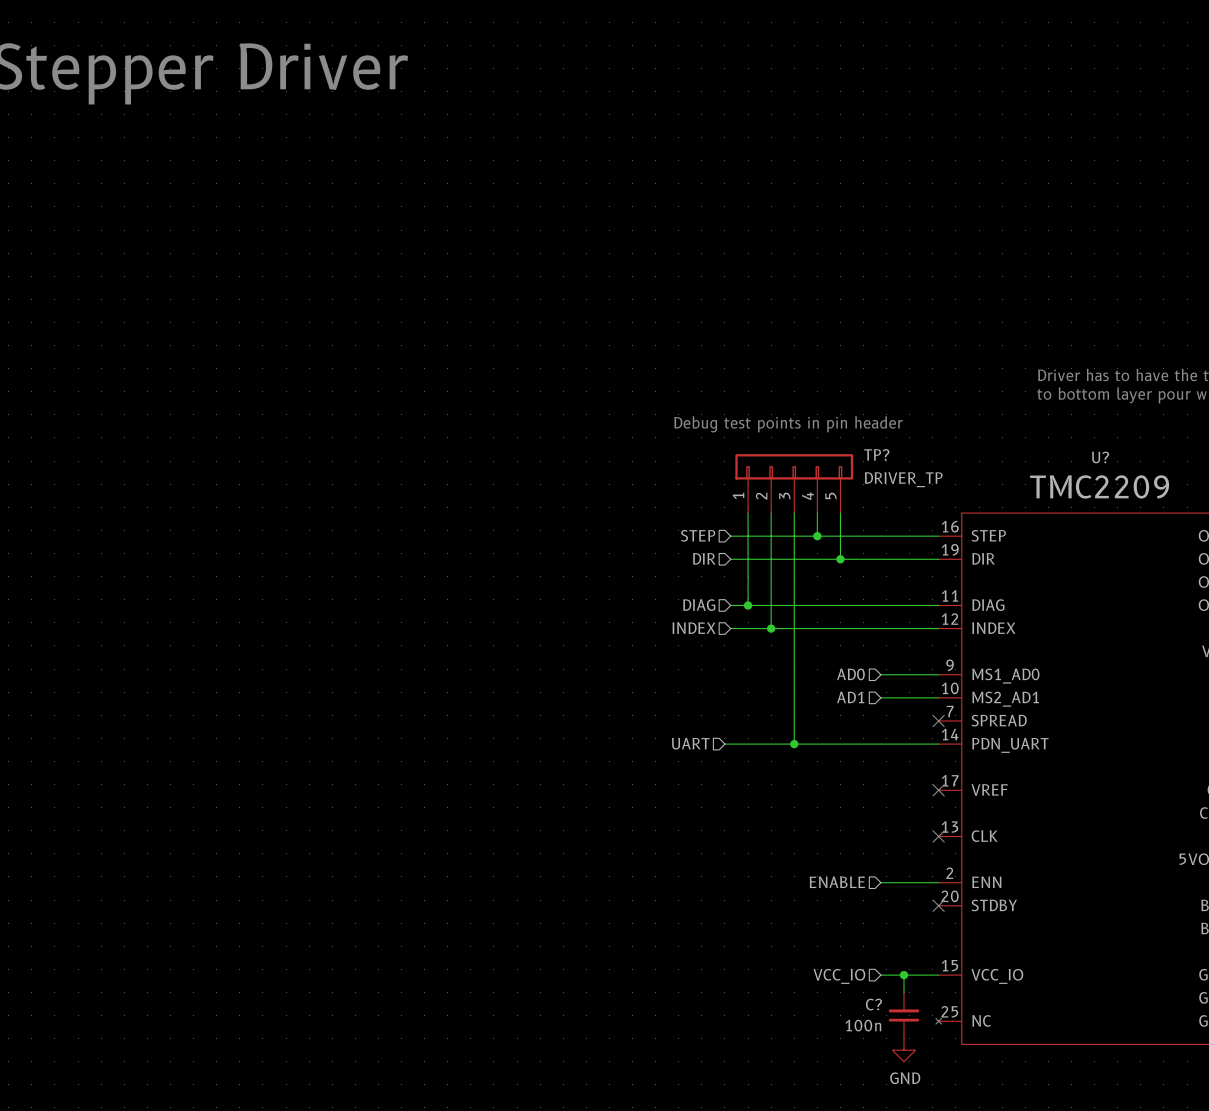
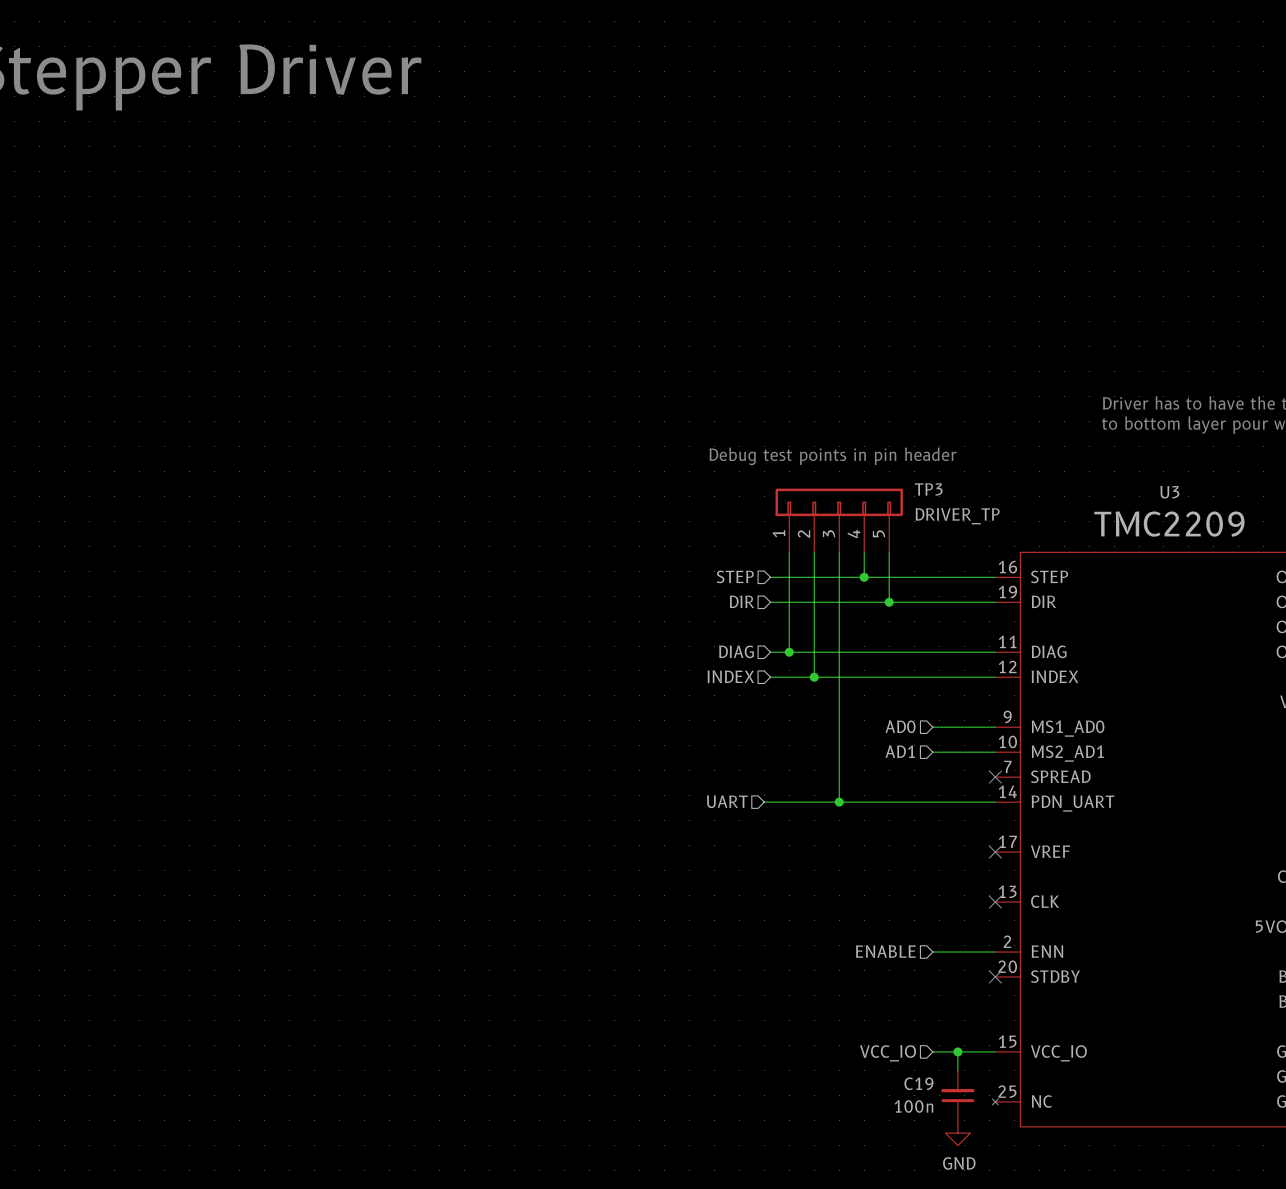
TP? name: TP? (876, 454) -> TP3 (928, 489)
U? name: U? (1100, 457) -> U3 (1169, 492)
C? name: C? (873, 1004) -> C19 (918, 1083)

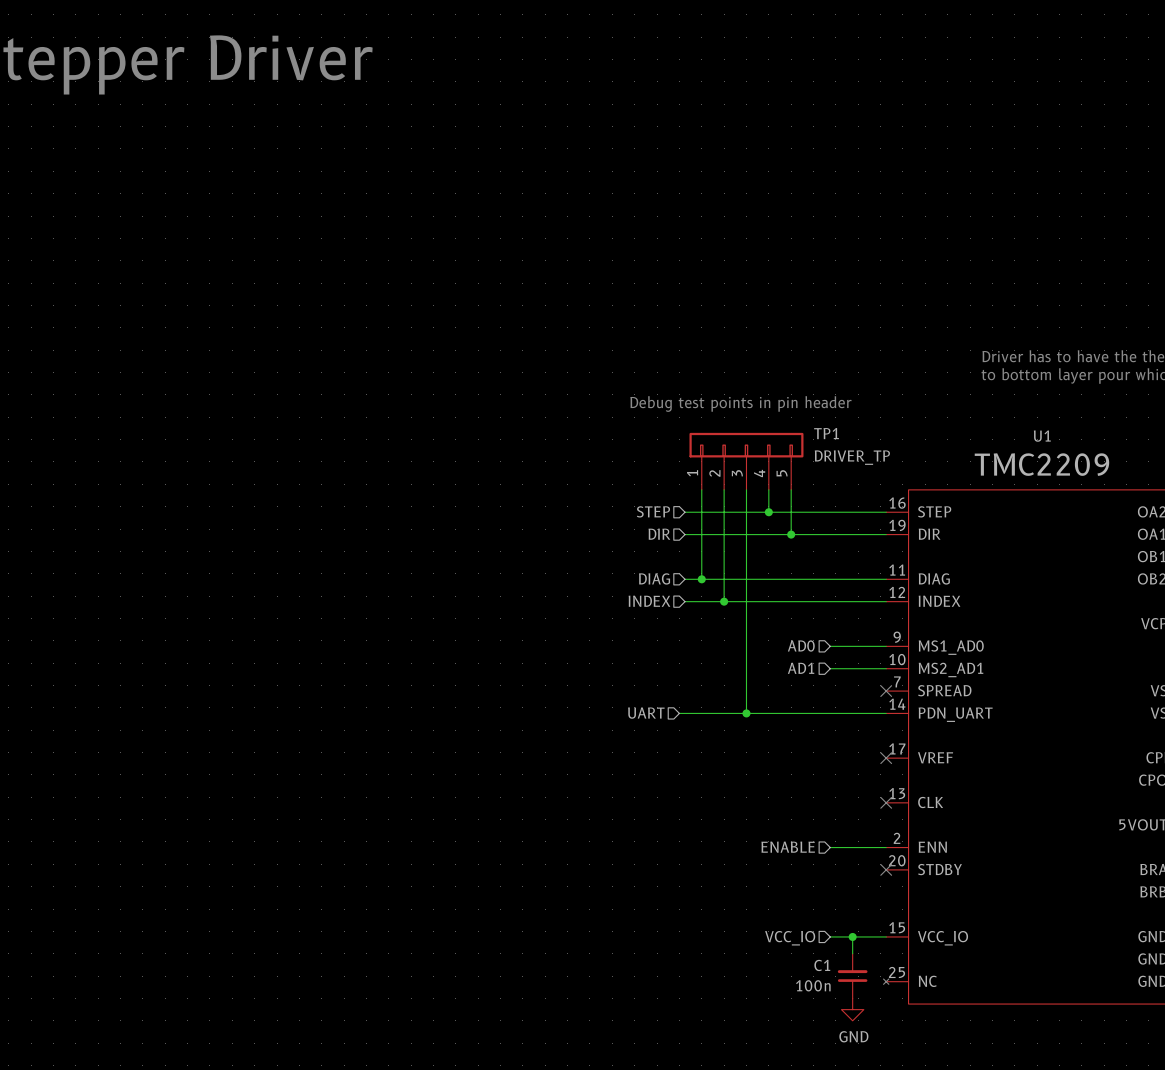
TP3 name: TP3 (928, 489) -> TP1 (826, 433)
U3 name: U3 (1169, 492) -> U1 (1042, 436)
C19 name: C19 (918, 1083) -> C1 (822, 965)

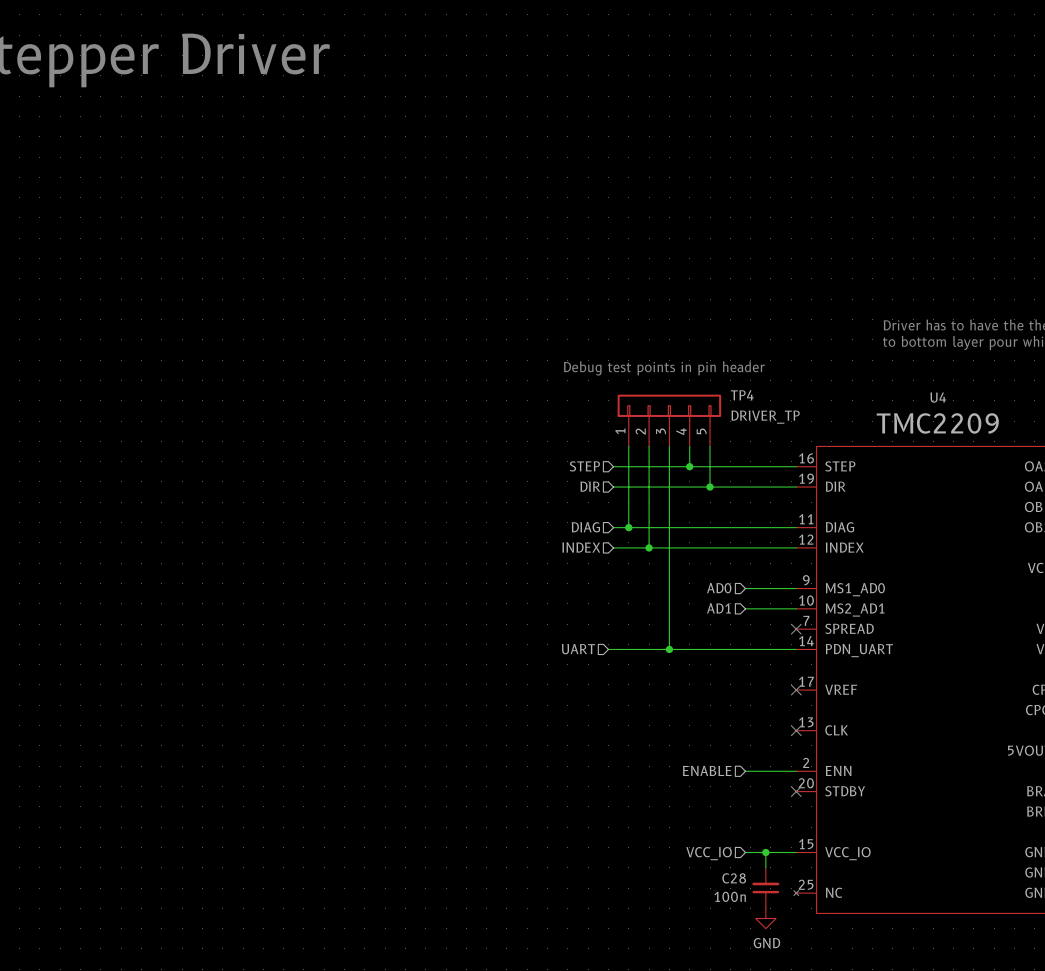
TP1 name: TP1 (826, 433) -> TP4 (742, 395)
U1 name: U1 (1042, 436) -> U4 (938, 397)
C1 name: C1 (822, 965) -> C28 (734, 878)

